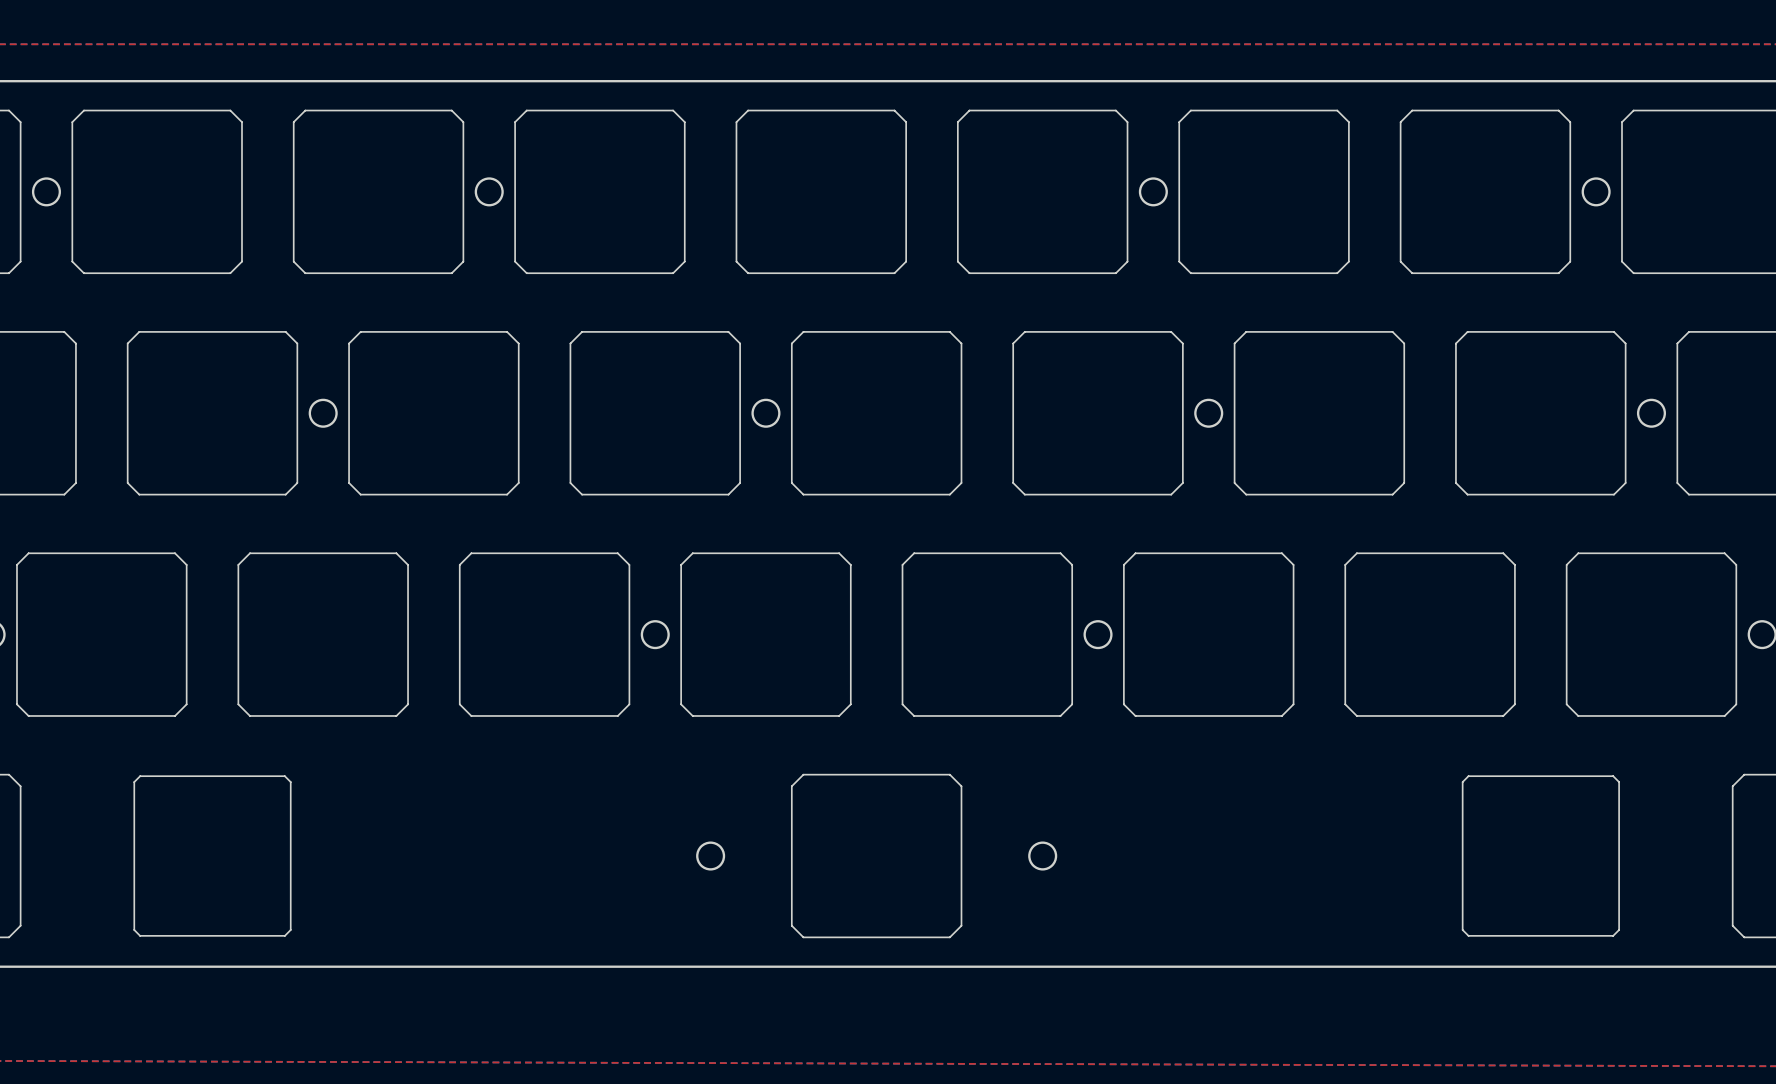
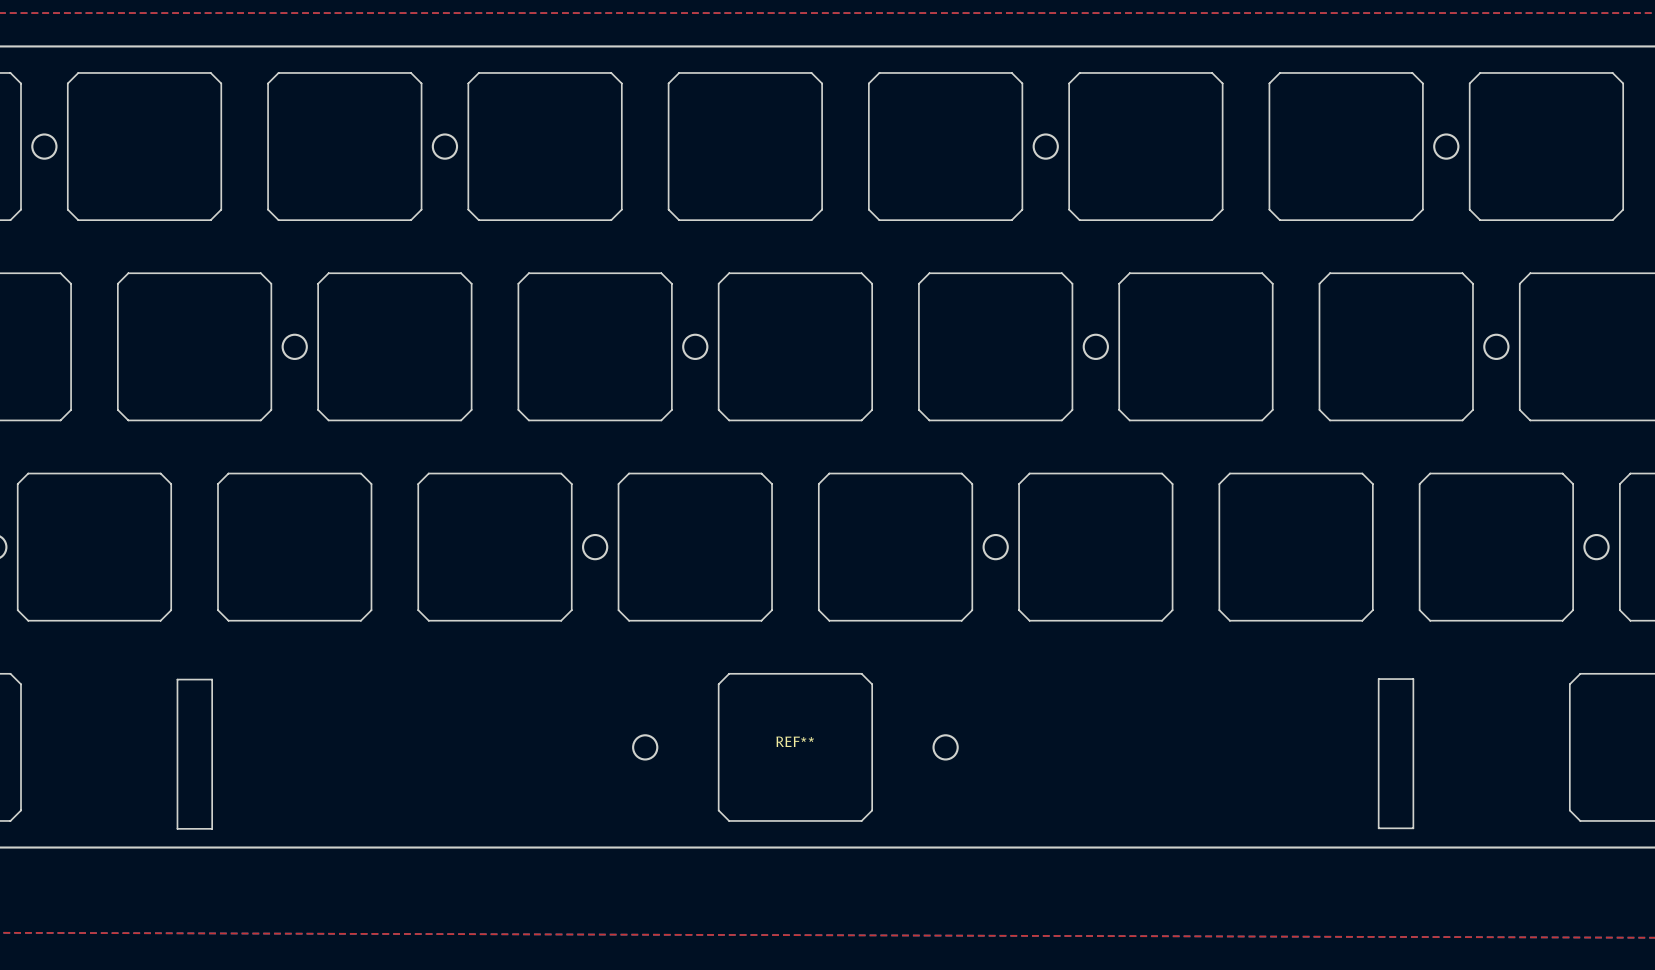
drawing: [133, 775, 1620, 937] -> none
REF**: none -> (795, 753)

